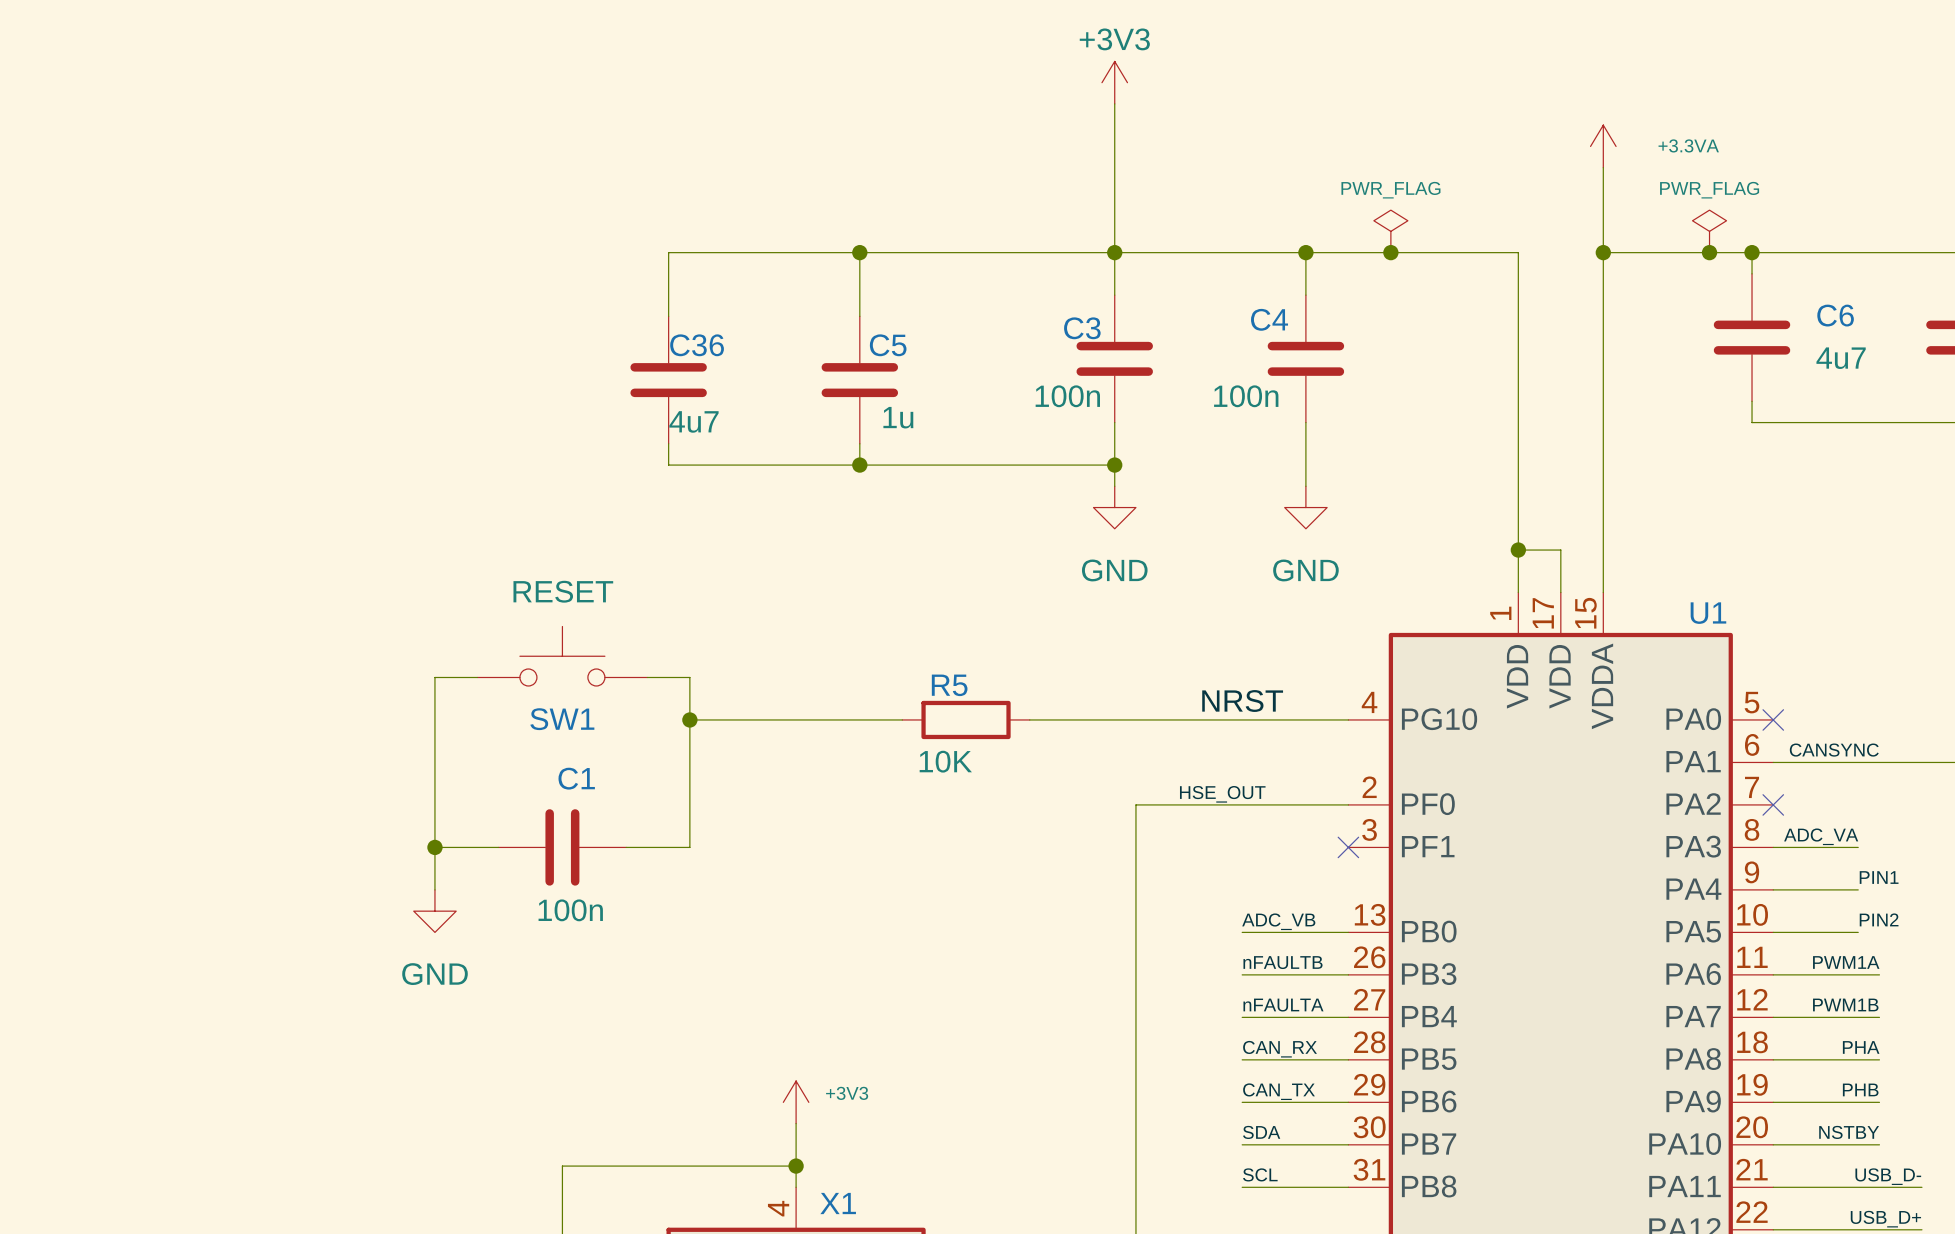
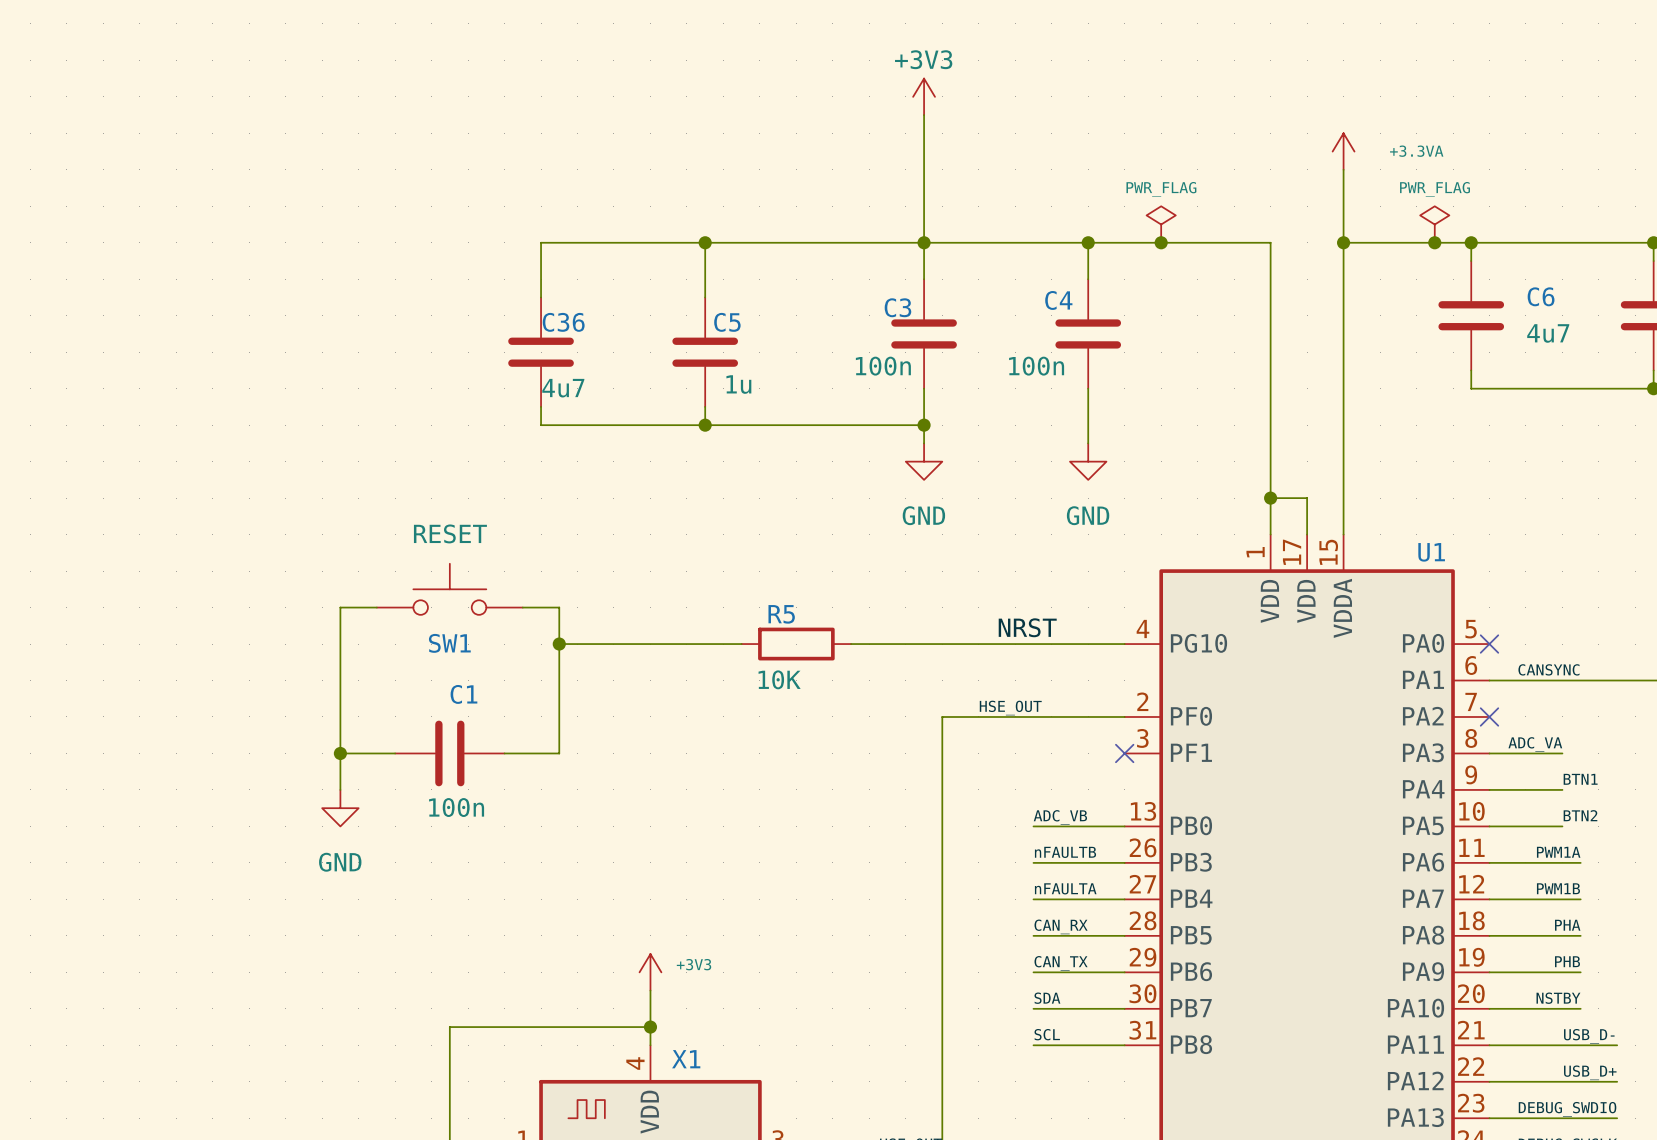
label: PIN1 (1879, 877) -> BTN1 (1580, 779)
label: PIN2 (1879, 919) -> BTN2 (1580, 815)

